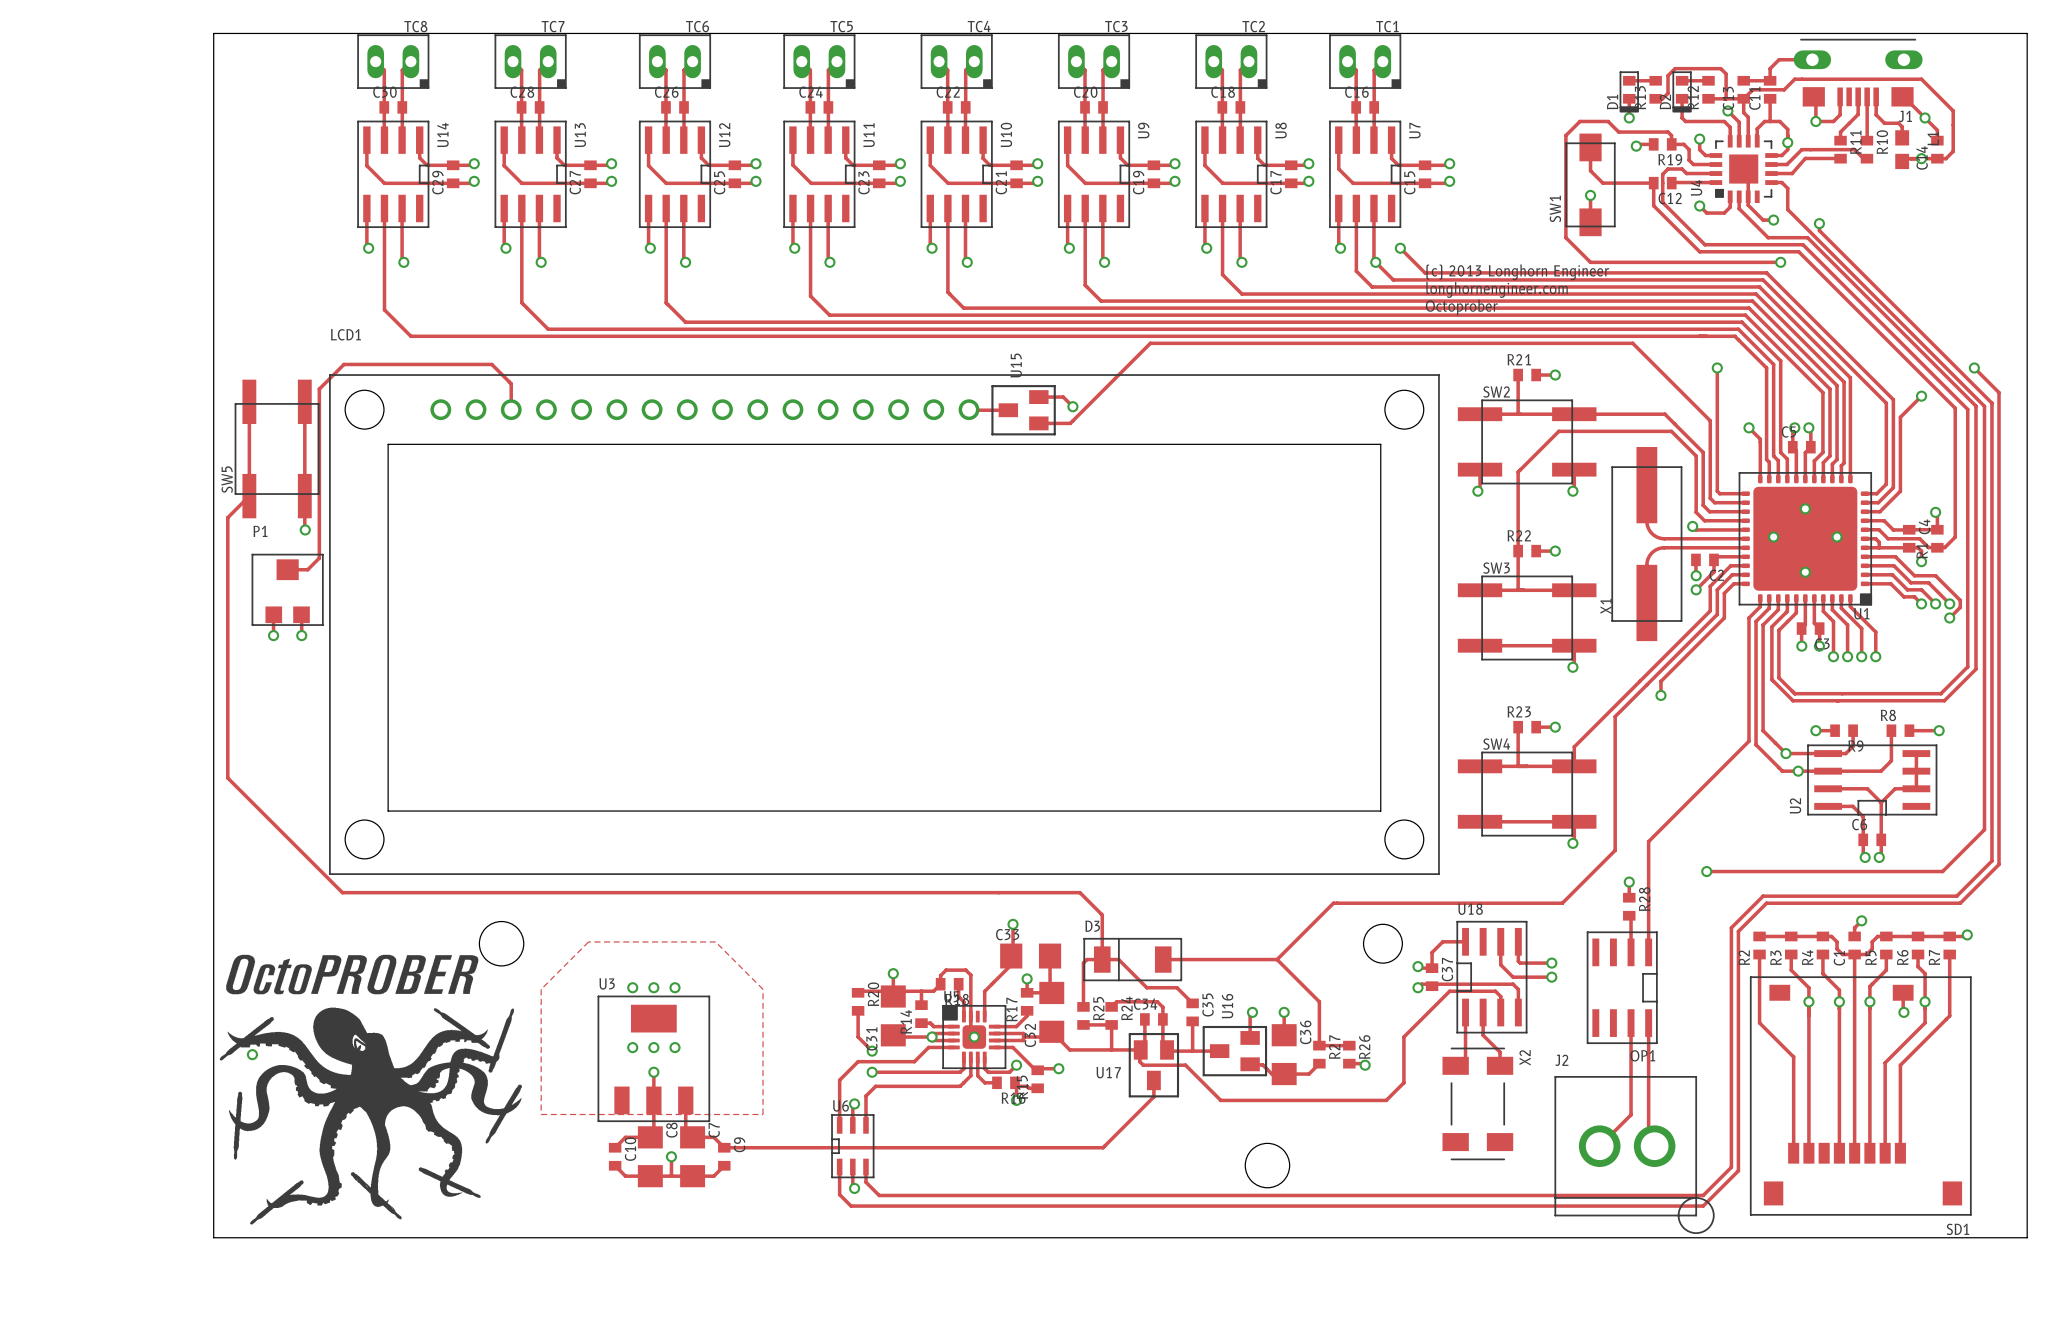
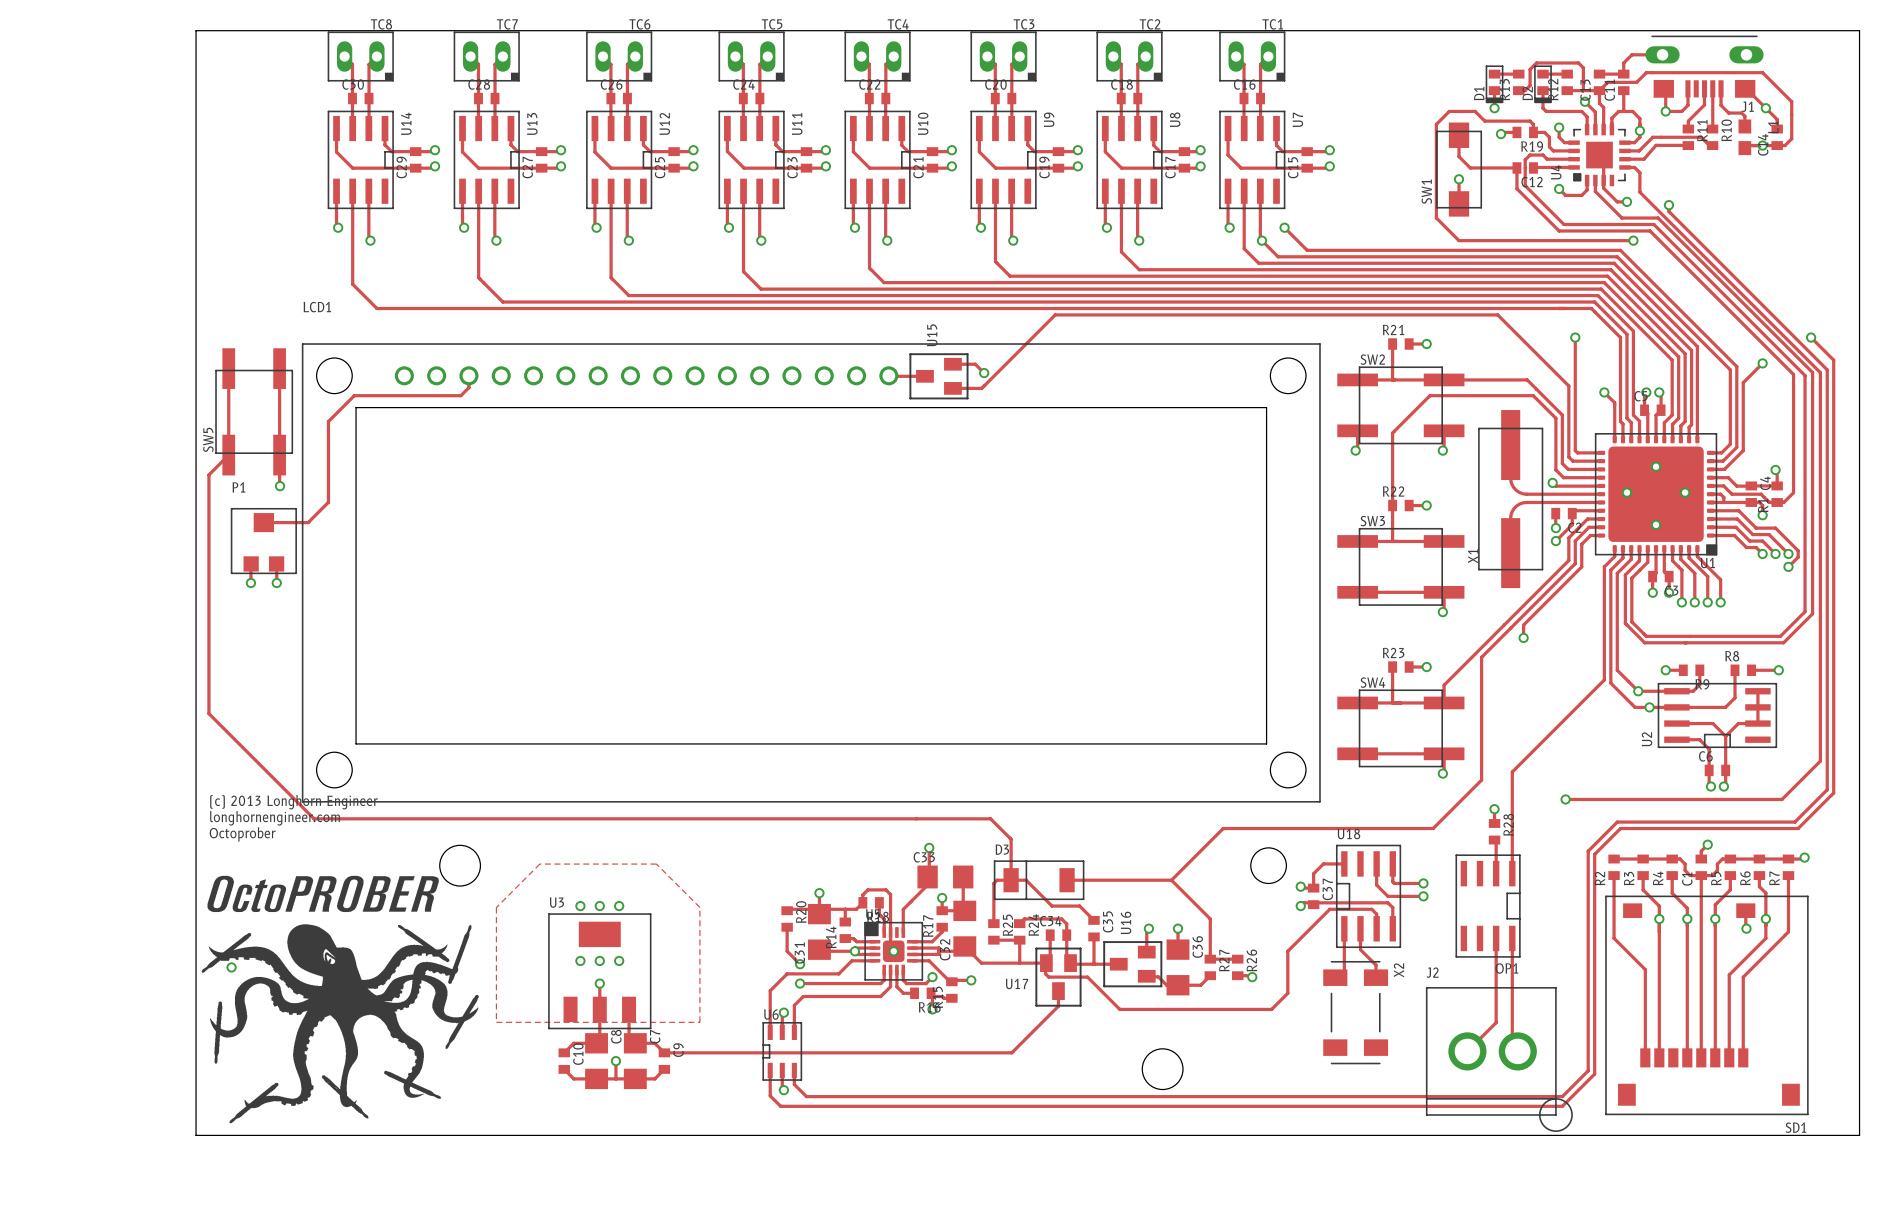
drawing: [1425, 264, 1610, 316] -> none
track: (511, 409) (511, 383) (491, 364) (343, 364) (319, 389) (319, 558) (307, 569) -> (468, 375) (468, 387) (460, 395) (354, 395) (328, 421) (328, 502) (308, 522) (282, 522)
drawing: none -> [209, 794, 378, 842]

